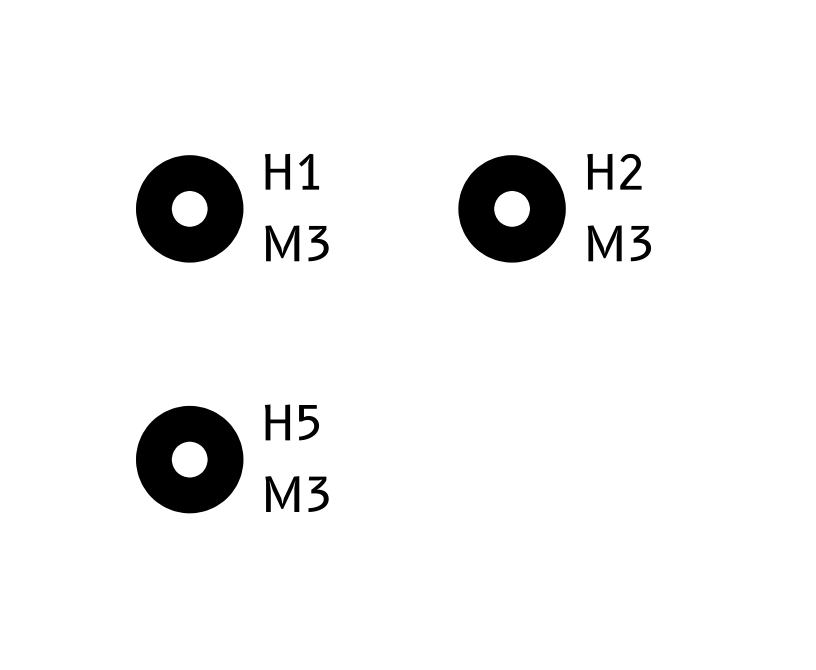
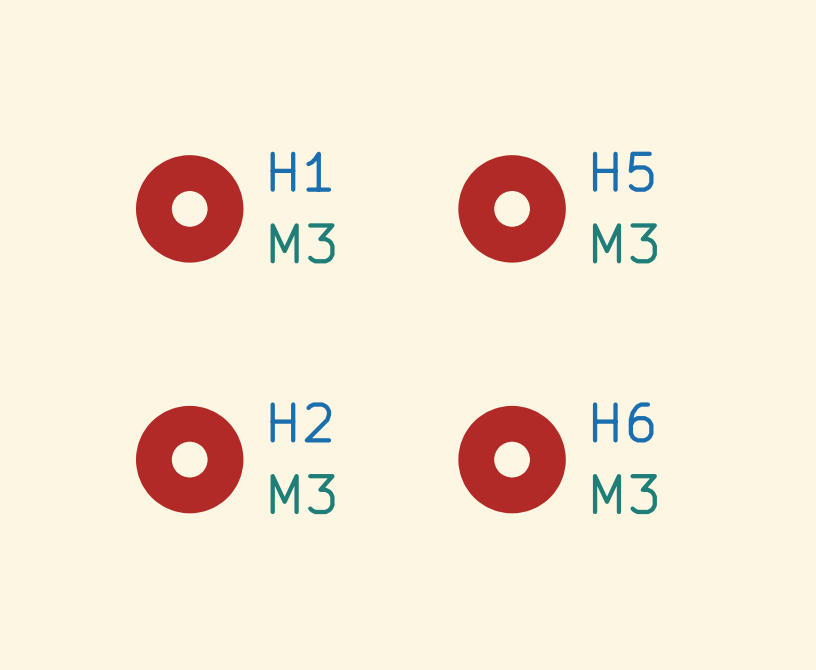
H2 name: H2 (614, 171) -> H5 (623, 171)
H5 name: H5 (291, 422) -> H2 (300, 422)
H6: none -> M3 (512, 459)

